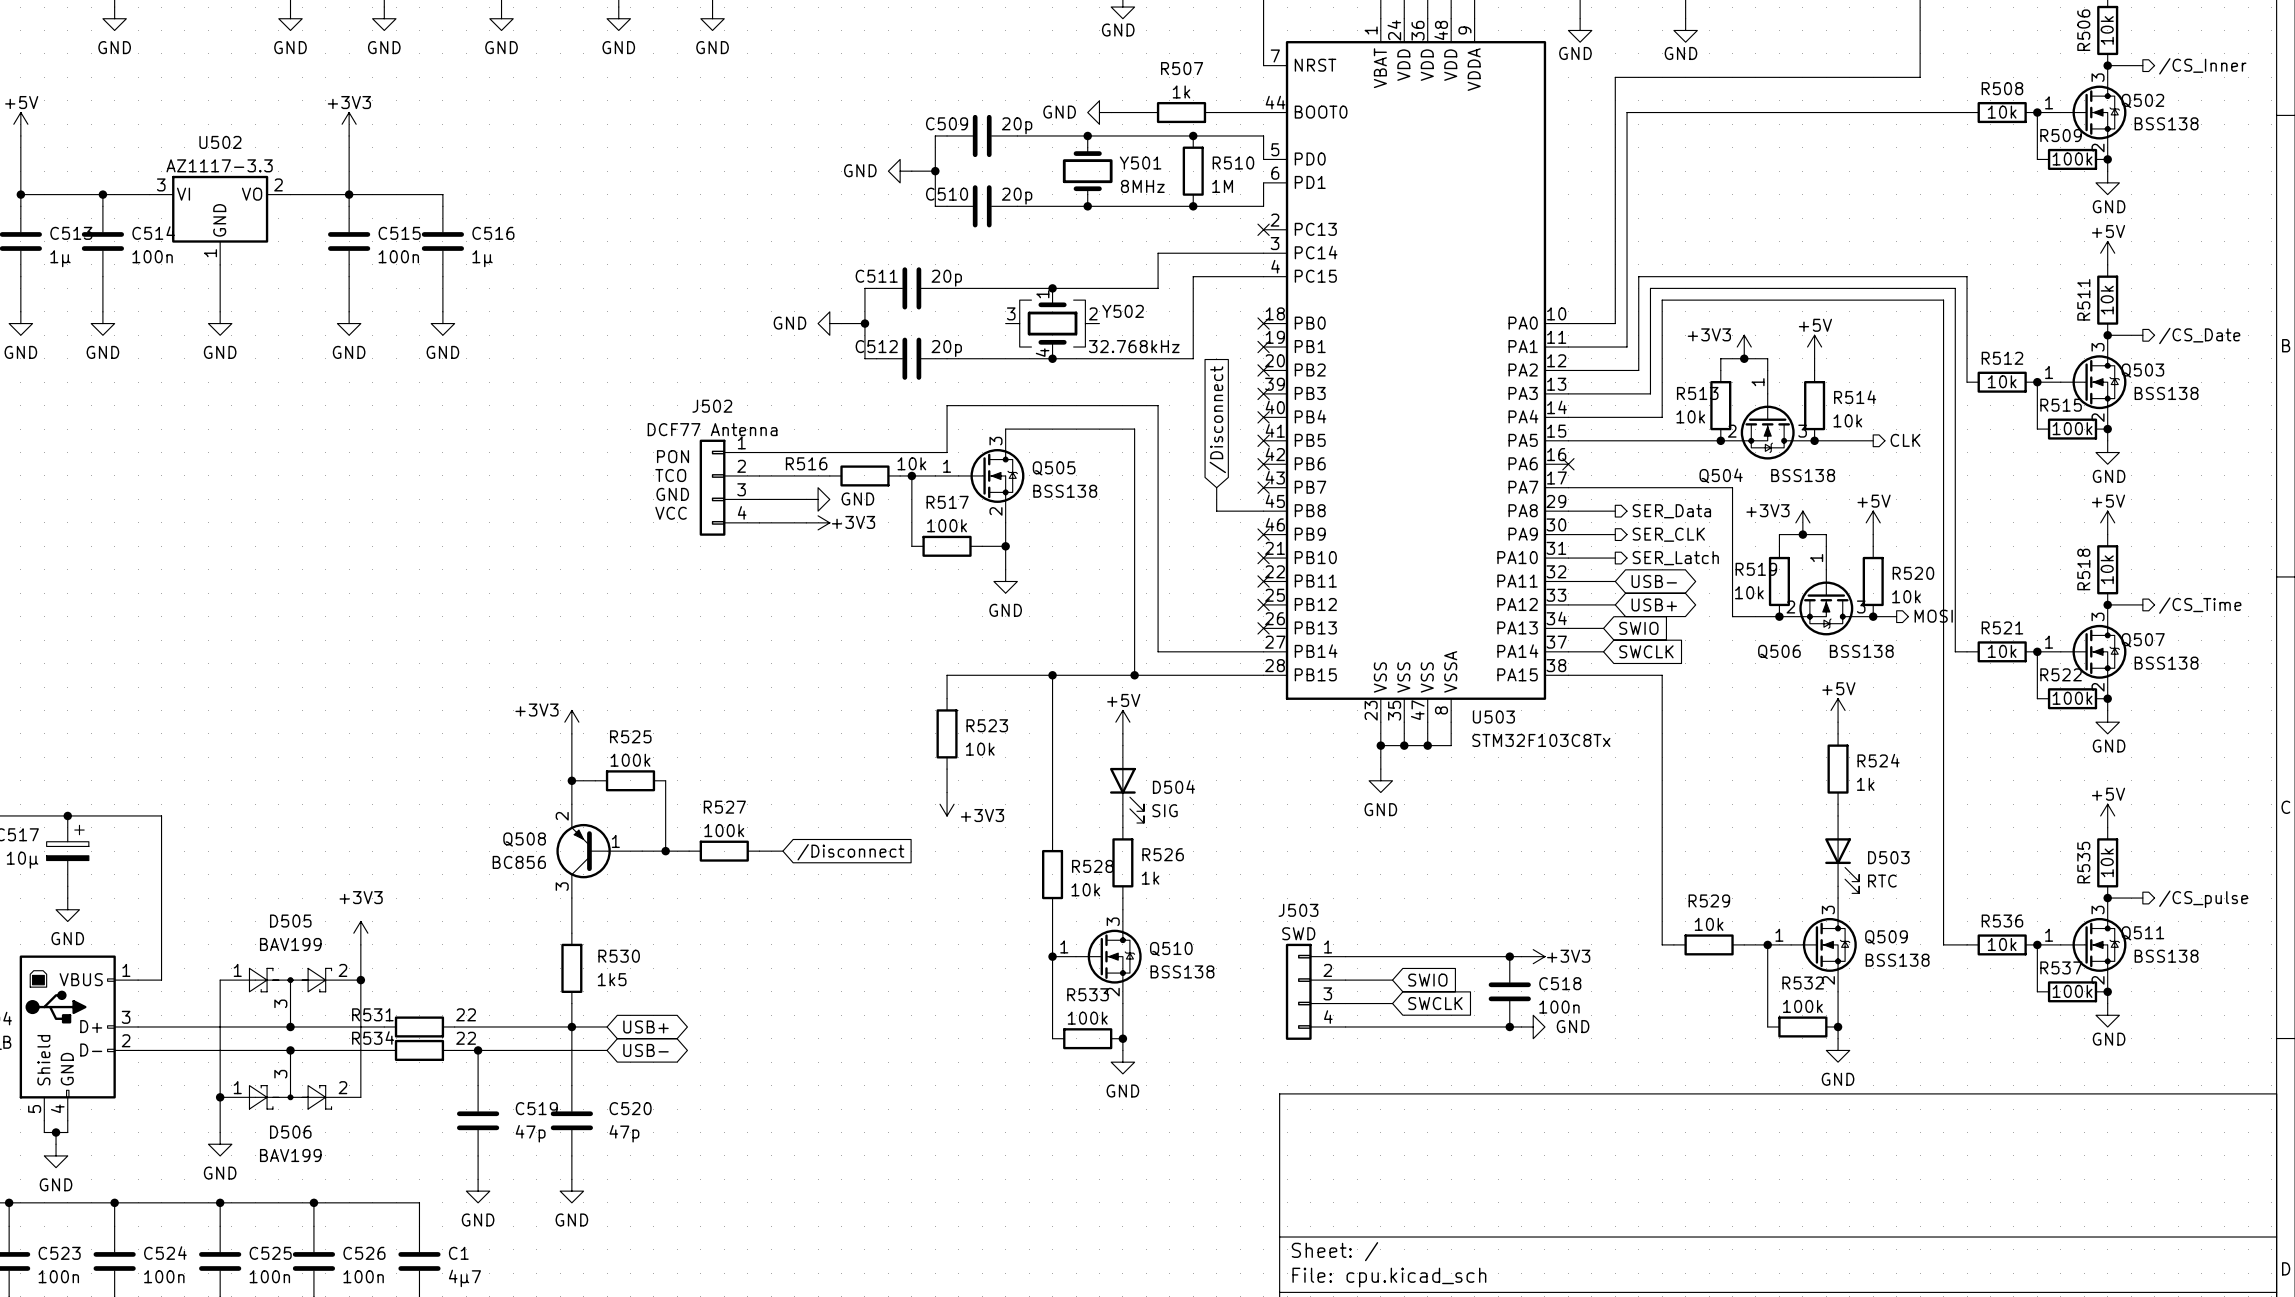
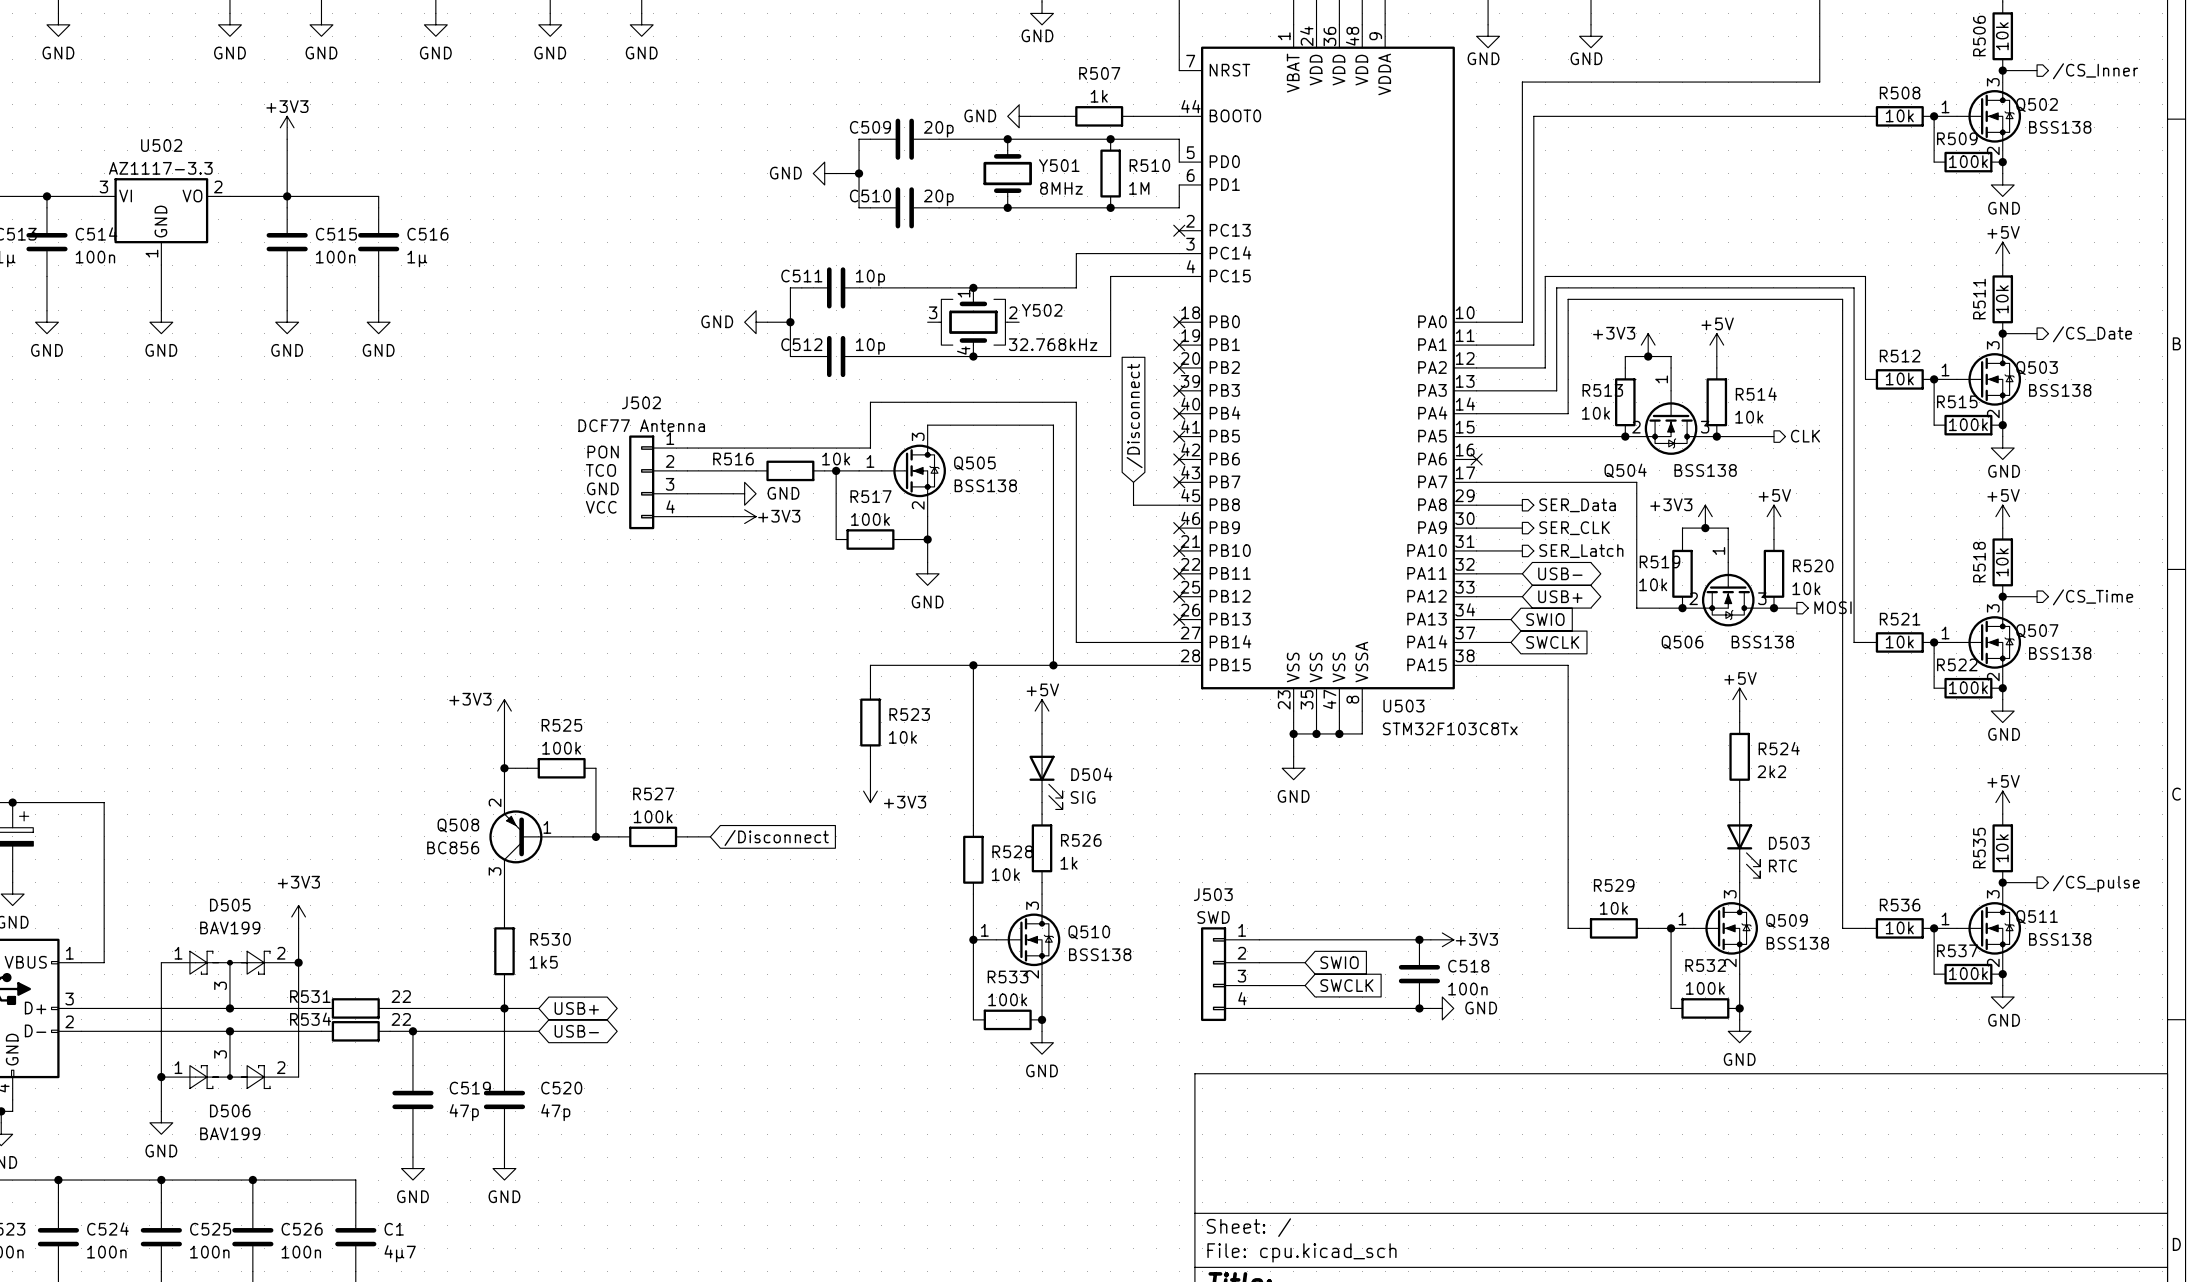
C511 value: 20p (946, 278) -> 10p (870, 277)
C512 value: 20p (946, 348) -> 10p (870, 346)
R524 value: 1k (1865, 784) -> 2k2 (1771, 771)

